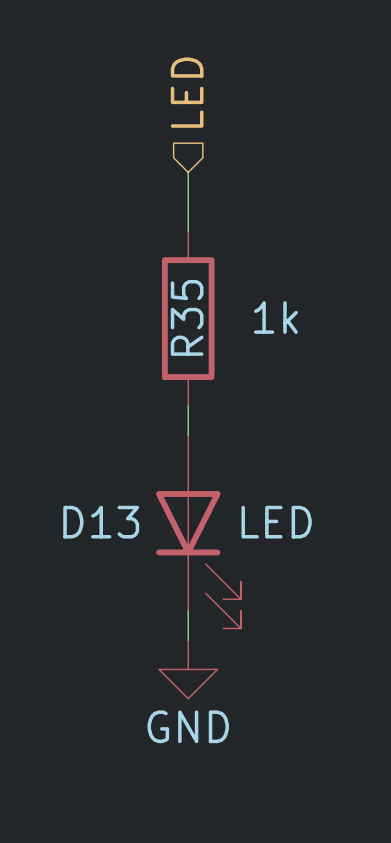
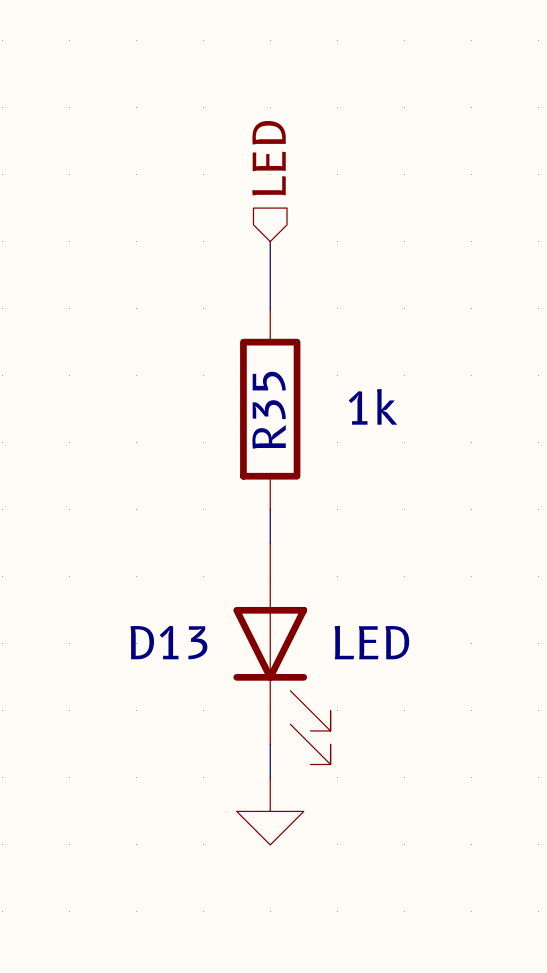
power symbol text: GND (188, 726) -> none

